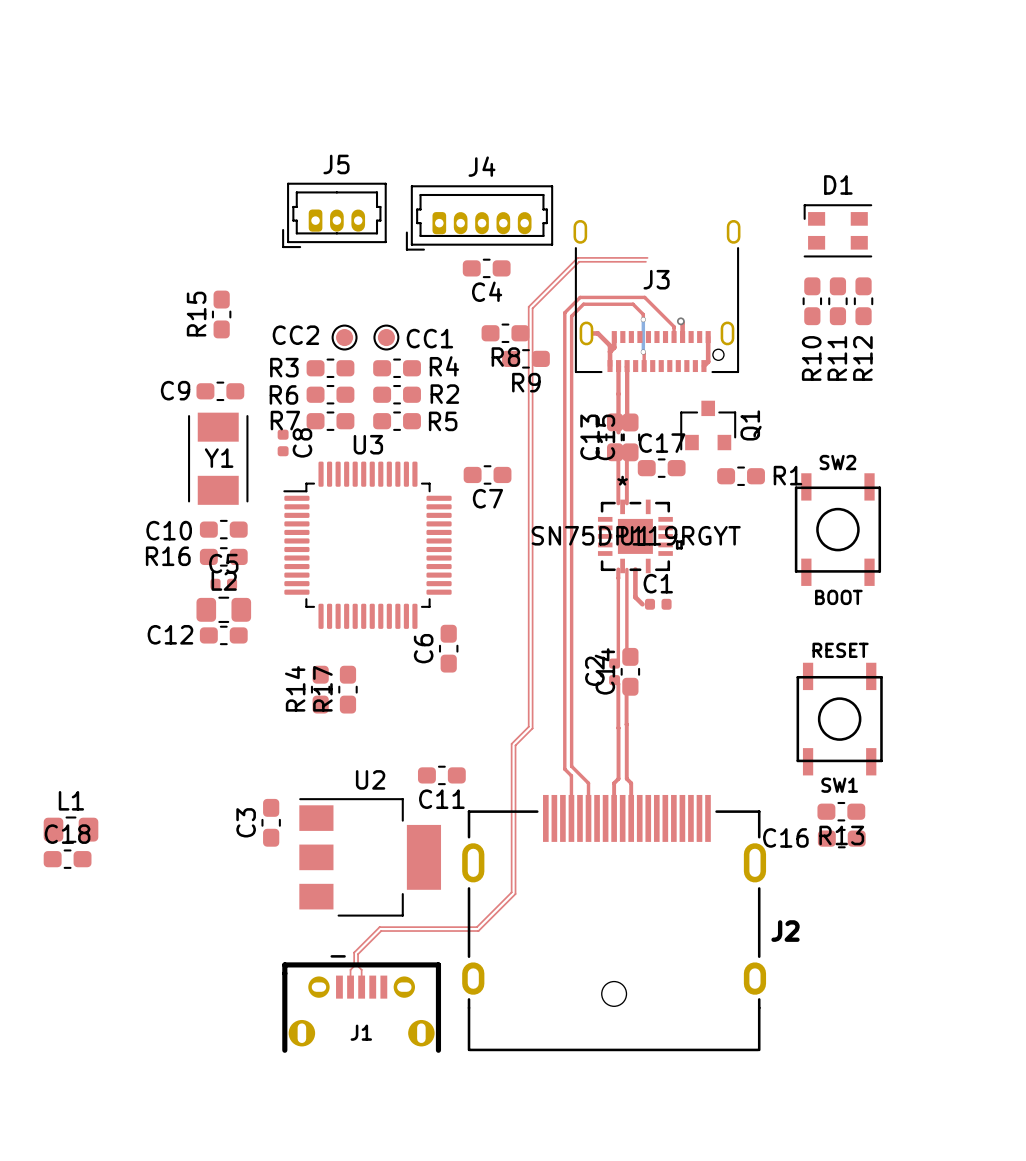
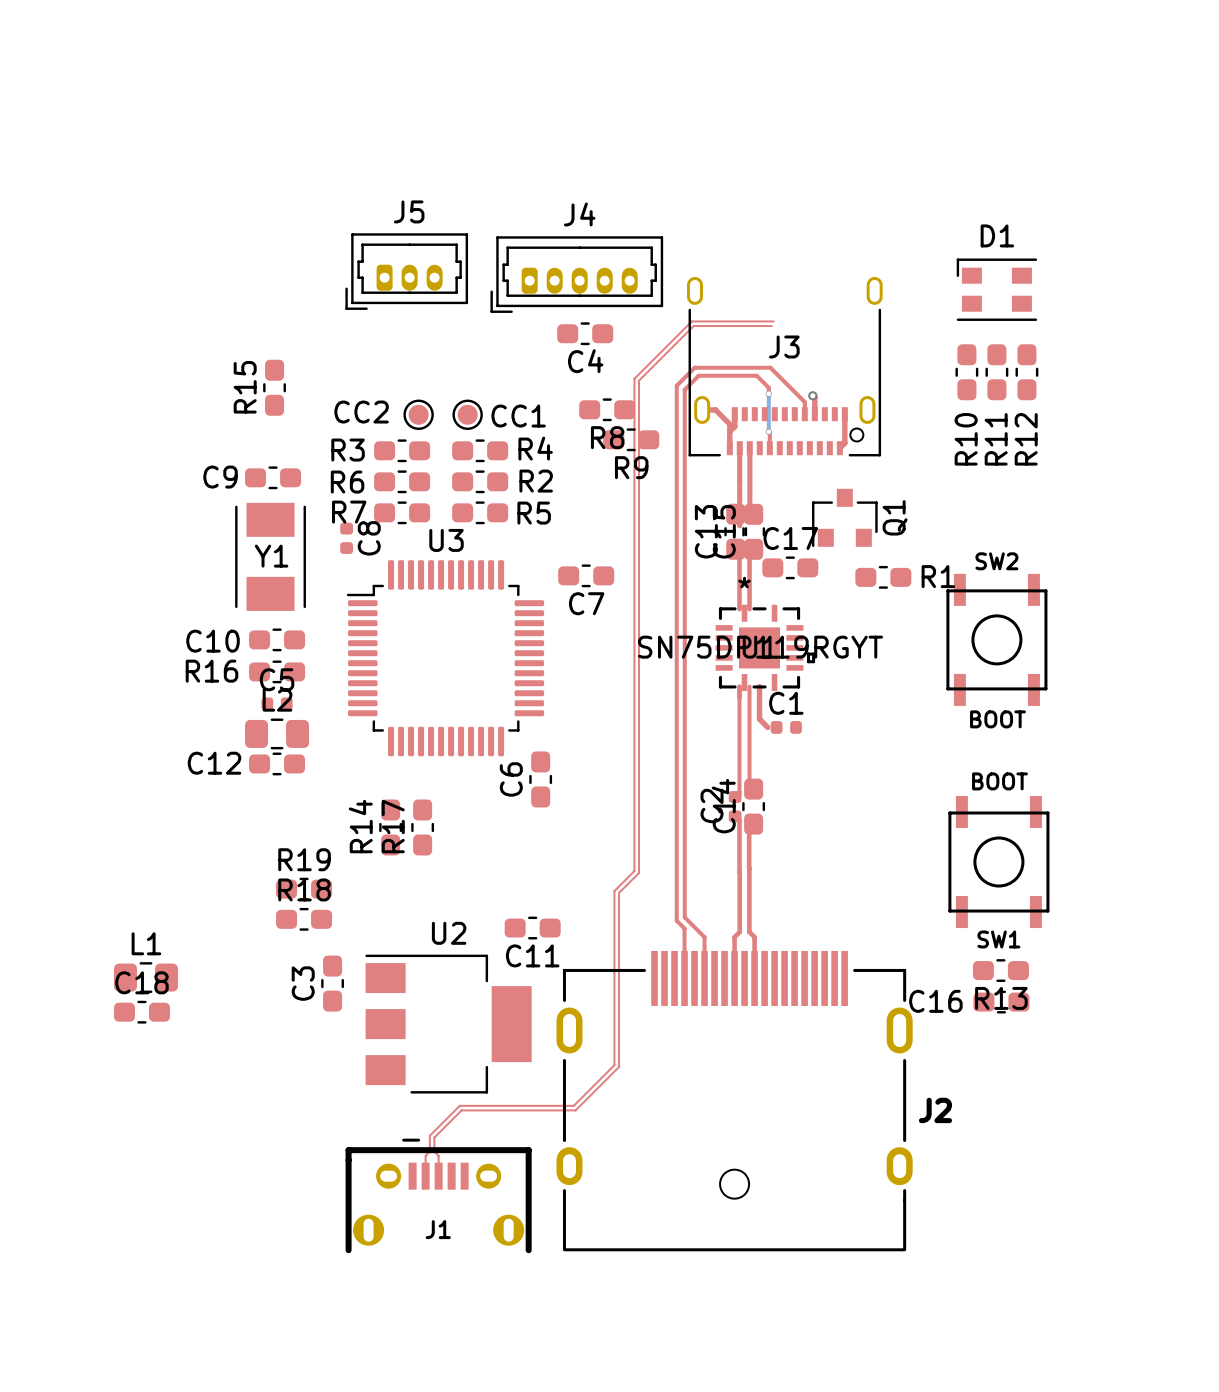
SW1 value: RESET (840, 650) -> BOOT (999, 781)
R19: none -> (304, 889)
R18: none -> (304, 919)
L1 position: (71, 829) -> (145, 977)
C18 position: (67, 859) -> (141, 1012)

